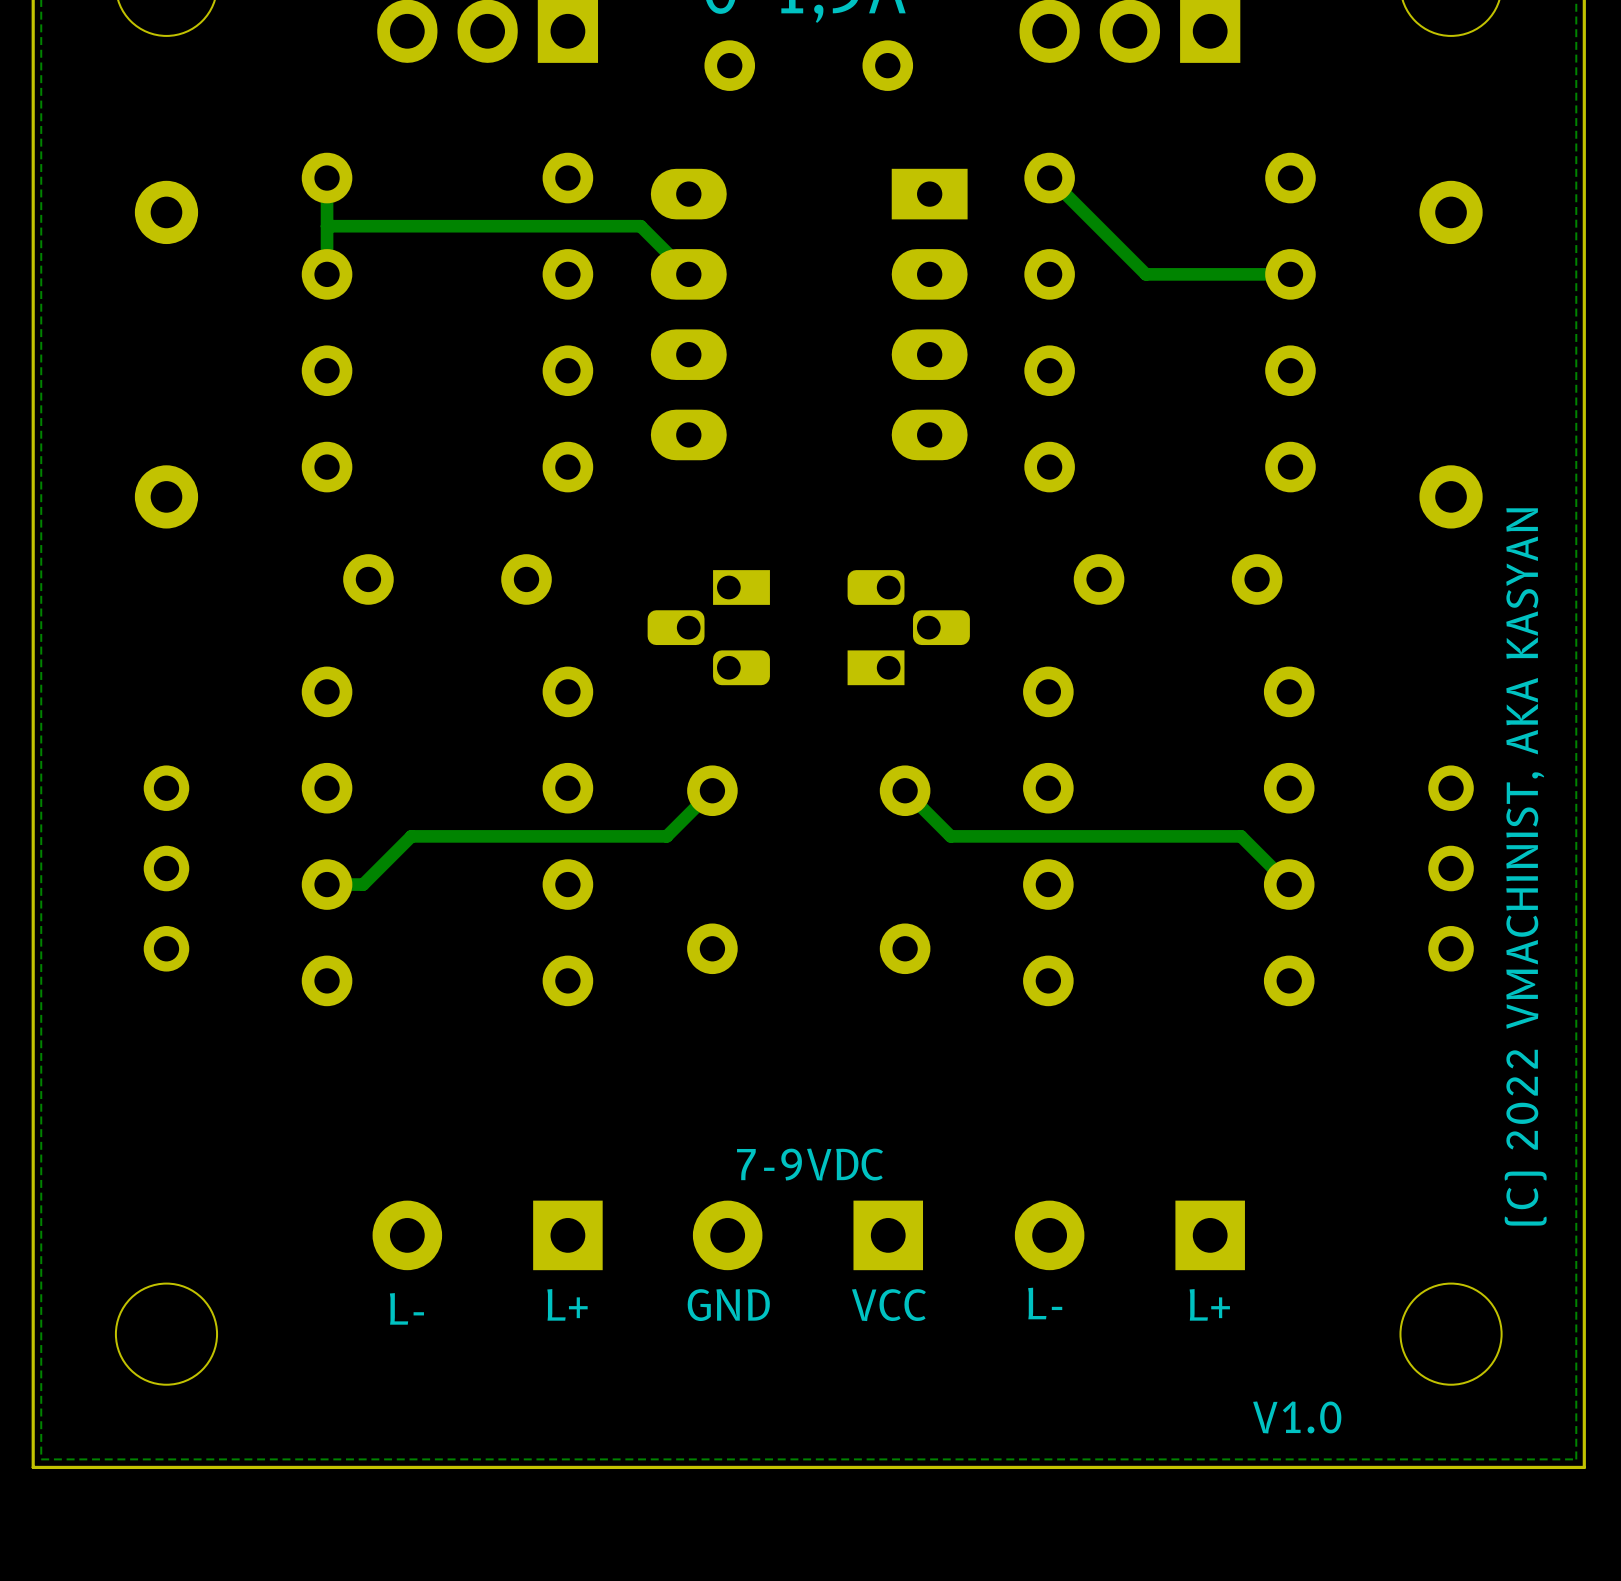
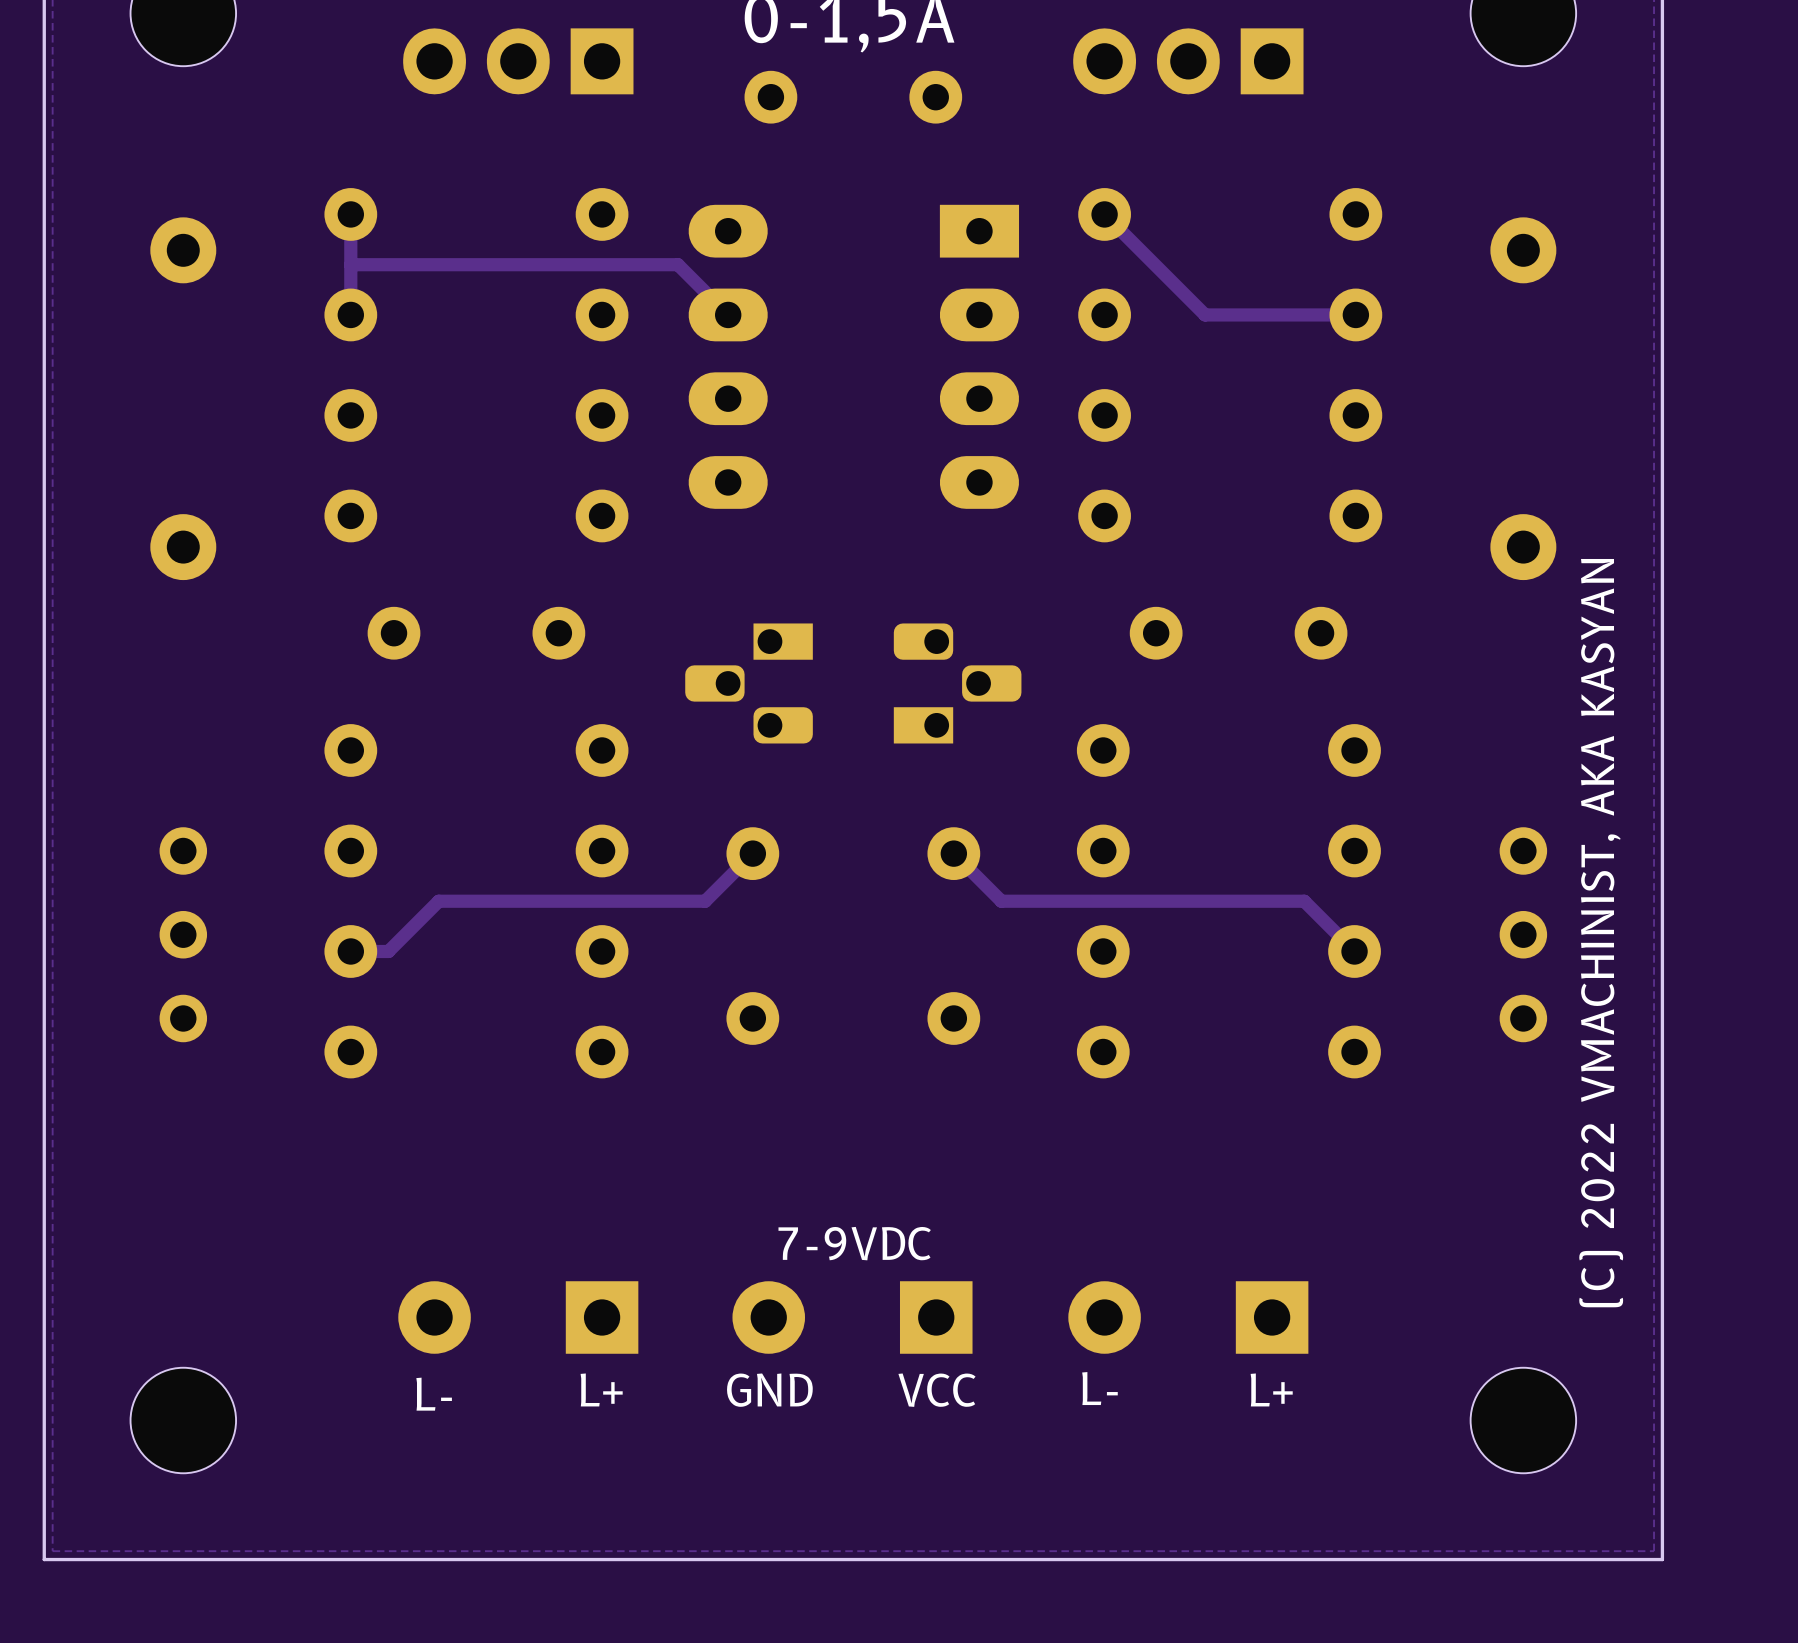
text: V1.0 (1297, 1417) -> none

